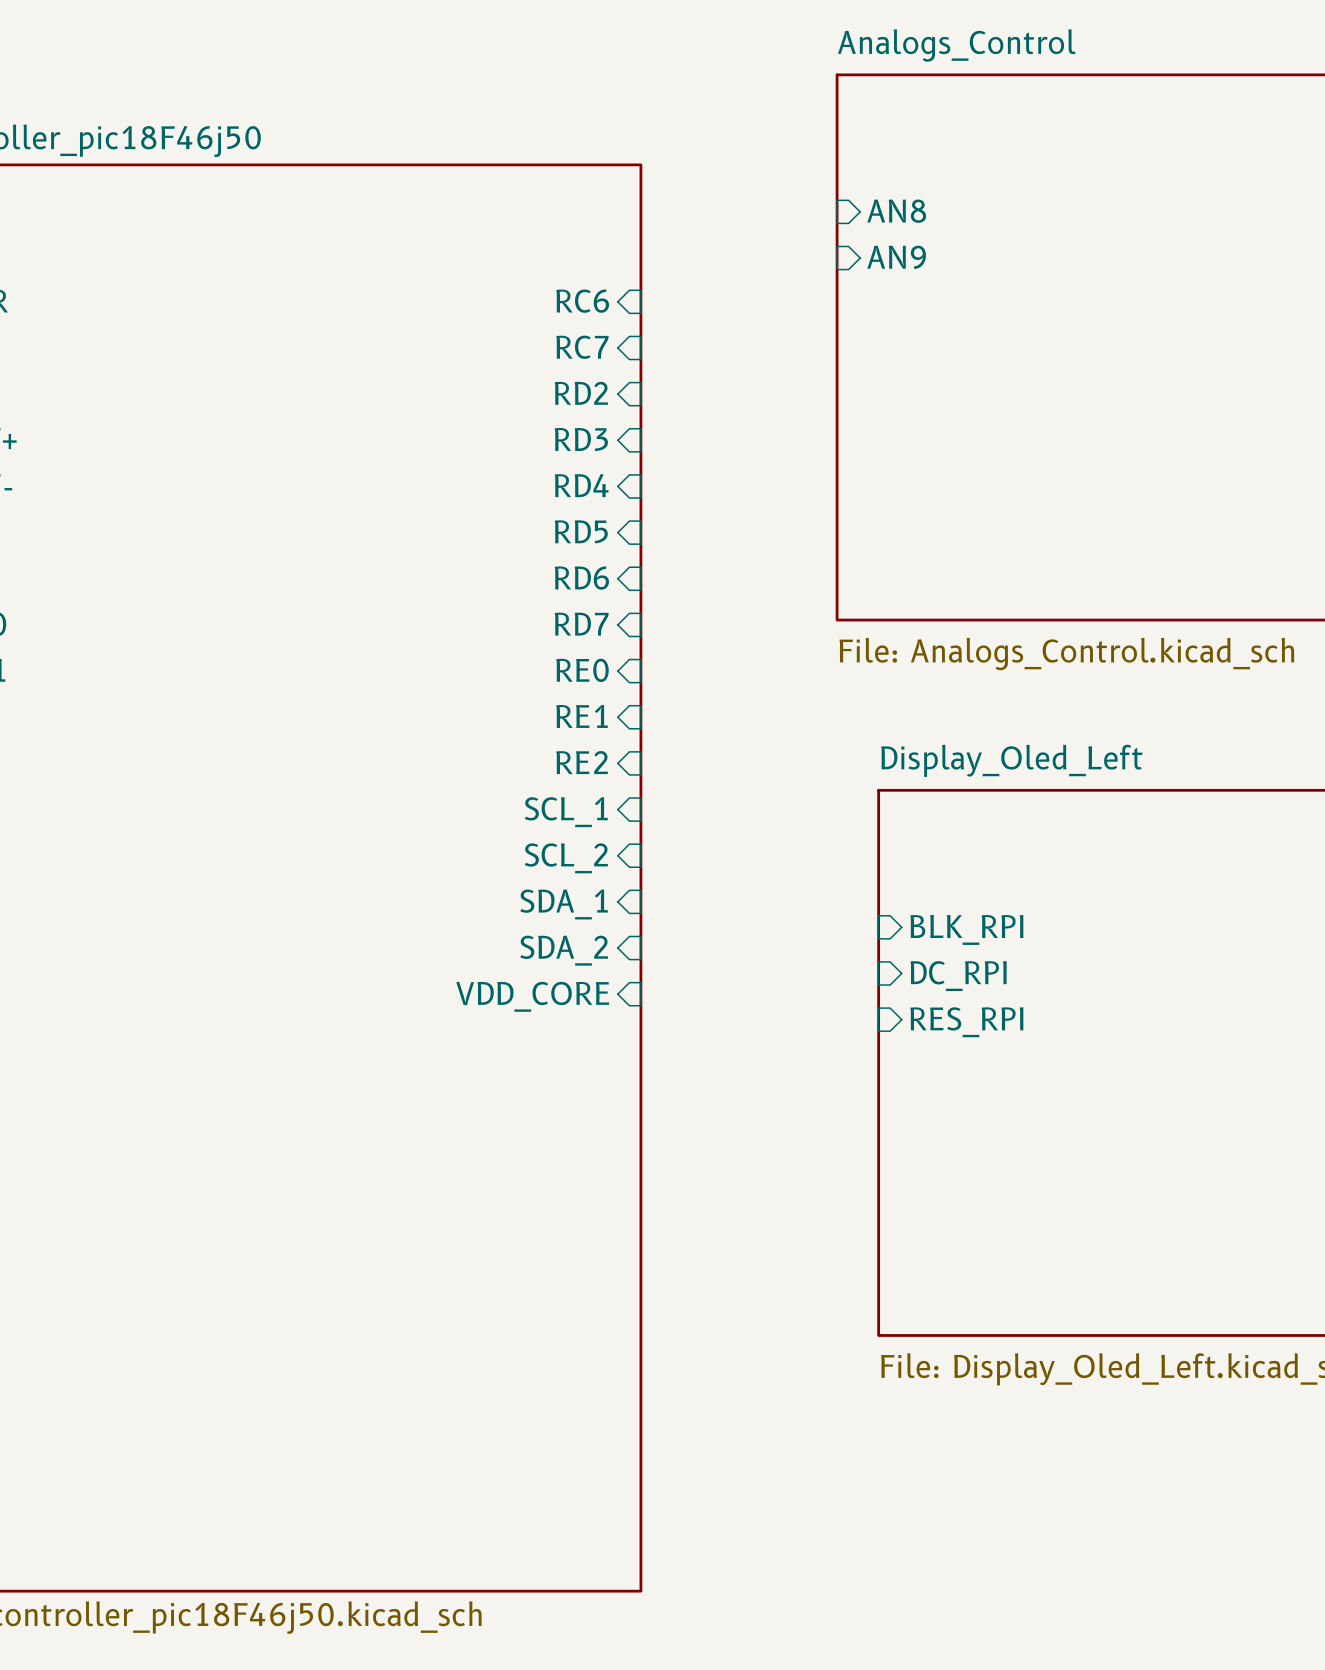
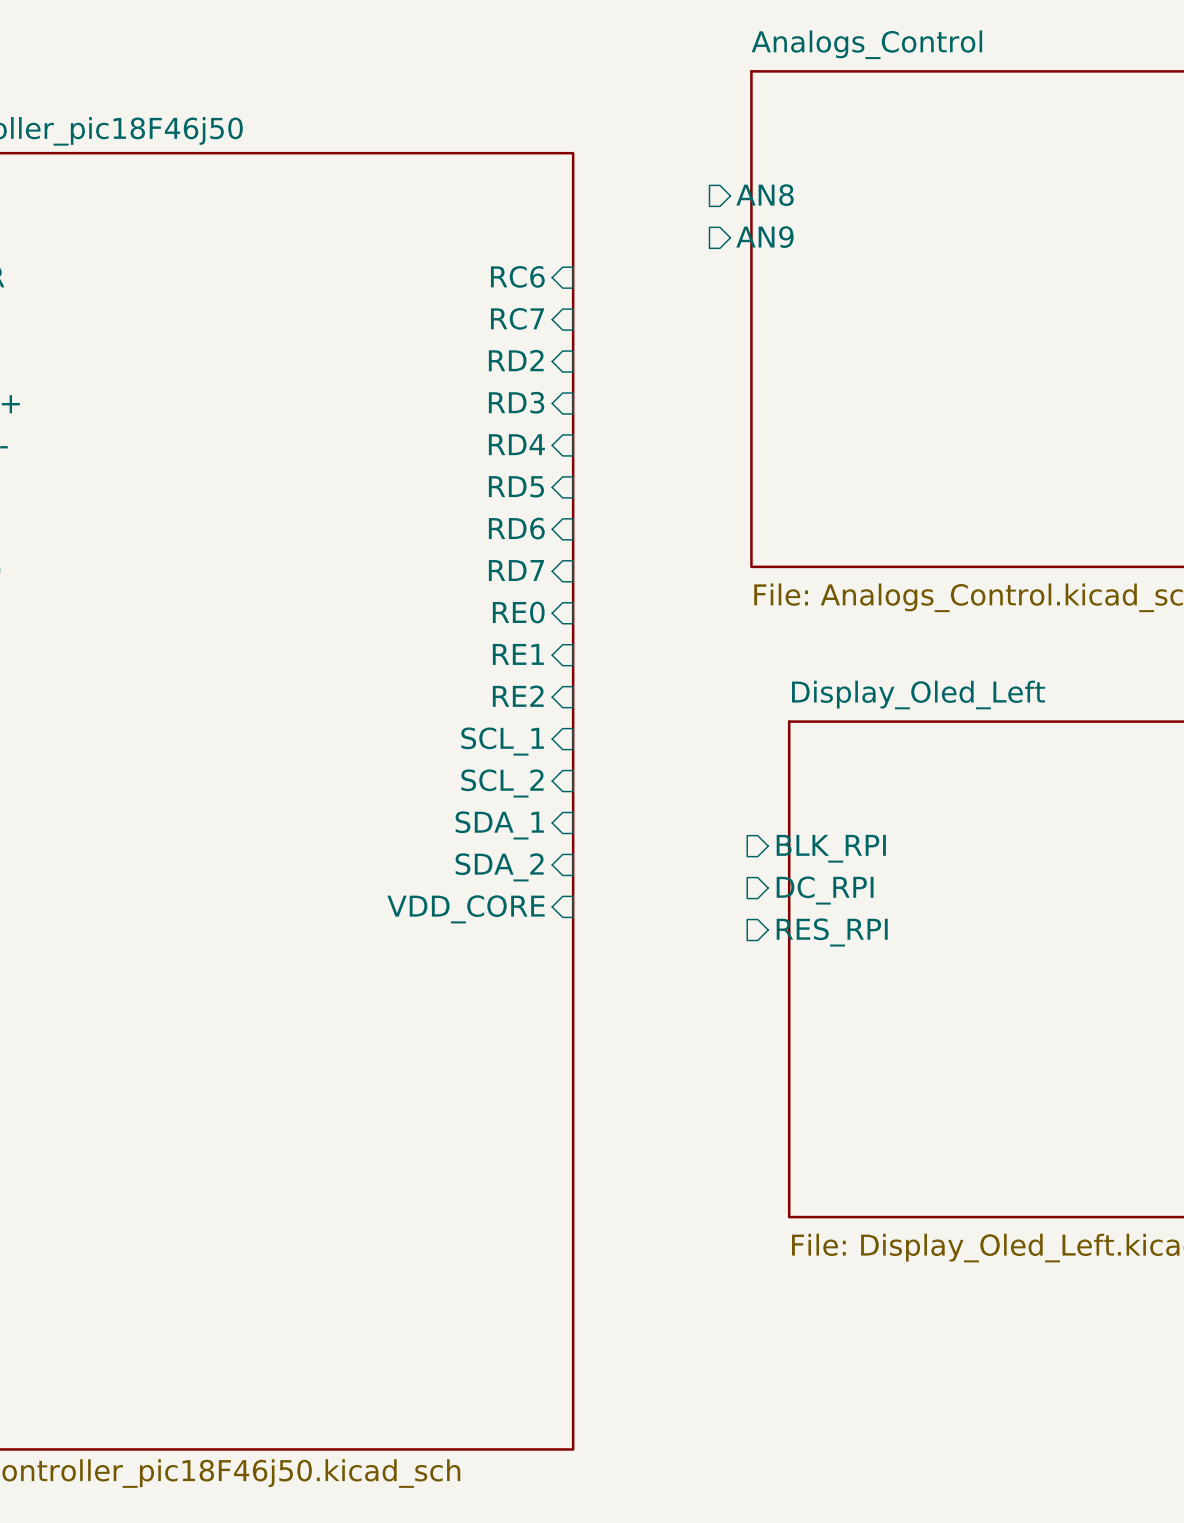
sheet pin position: AN8 (896, 211) -> AN8 (765, 195)
sheet pin position: AN9 (896, 257) -> AN9 (764, 237)
sheet pin position: BLK_RPI (966, 929) -> BLK_RPI (831, 848)
sheet pin position: DC_RPI (958, 976) -> DC_RPI (825, 890)
sheet pin position: RES_RPI (966, 1022) -> RES_RPI (832, 932)

